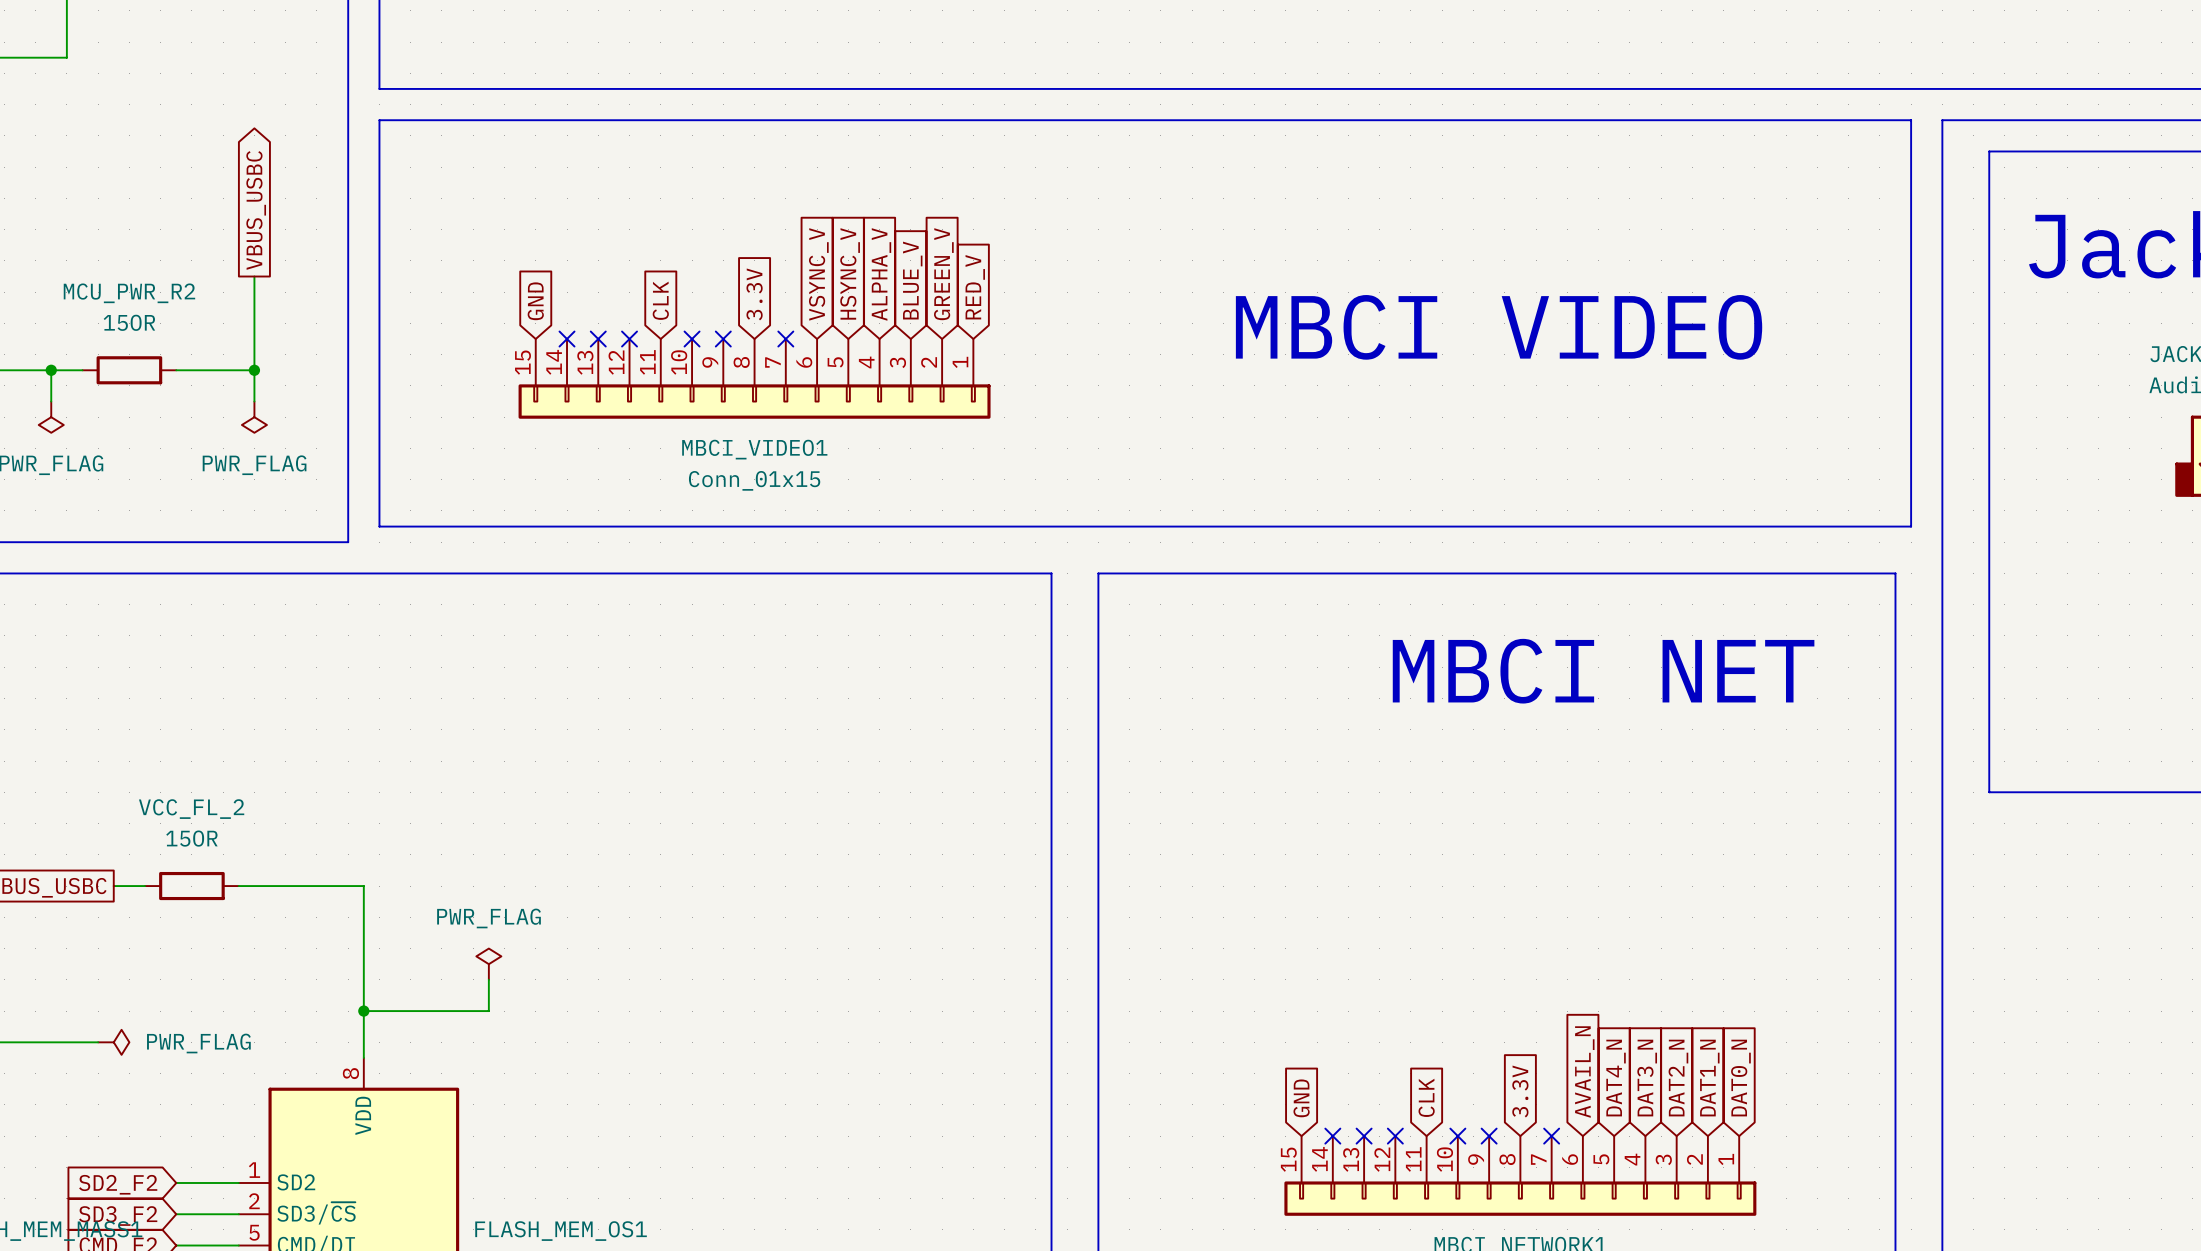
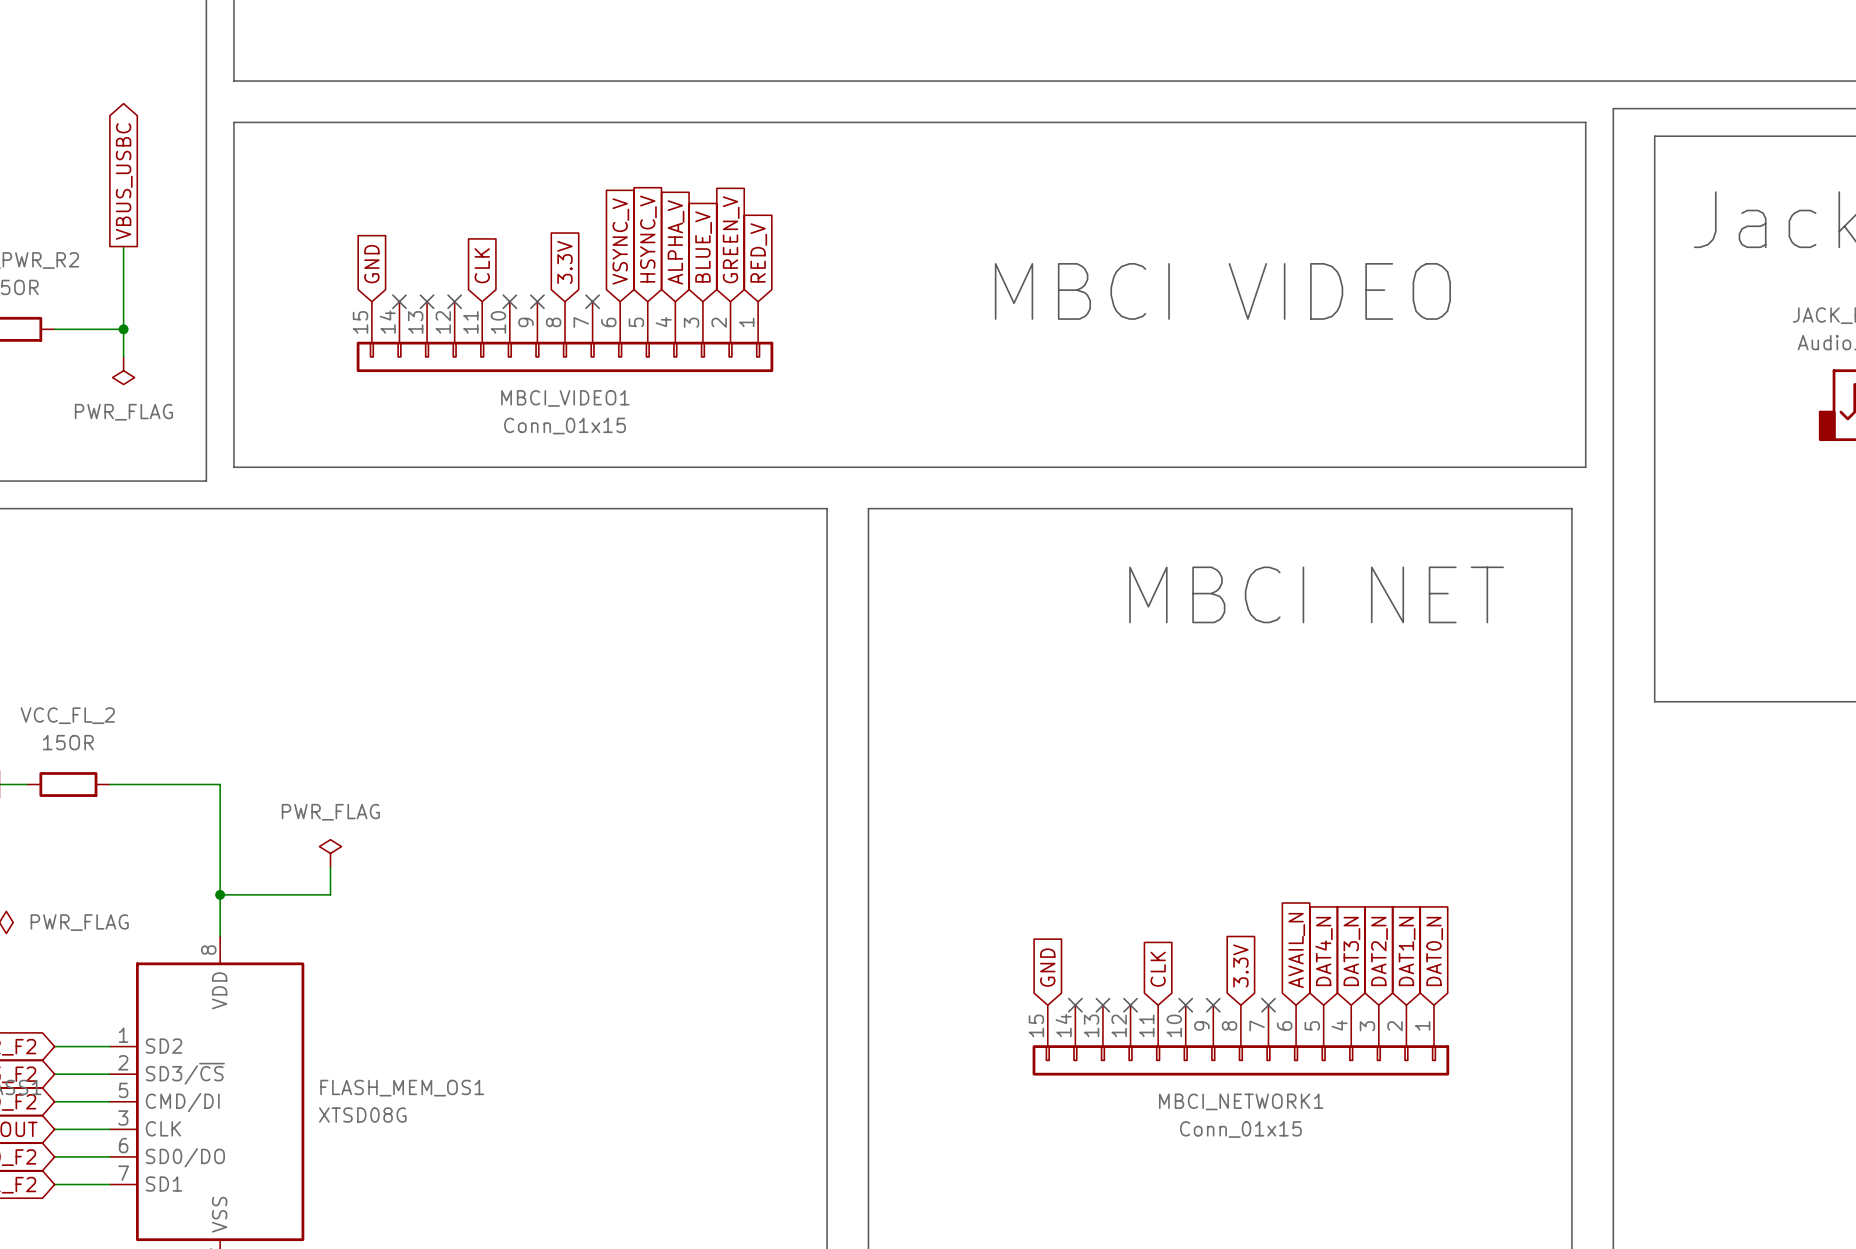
line: (379, 135) (379, 120) (1911, 120) (1911, 135) -> (233, 122) (1585, 122)

